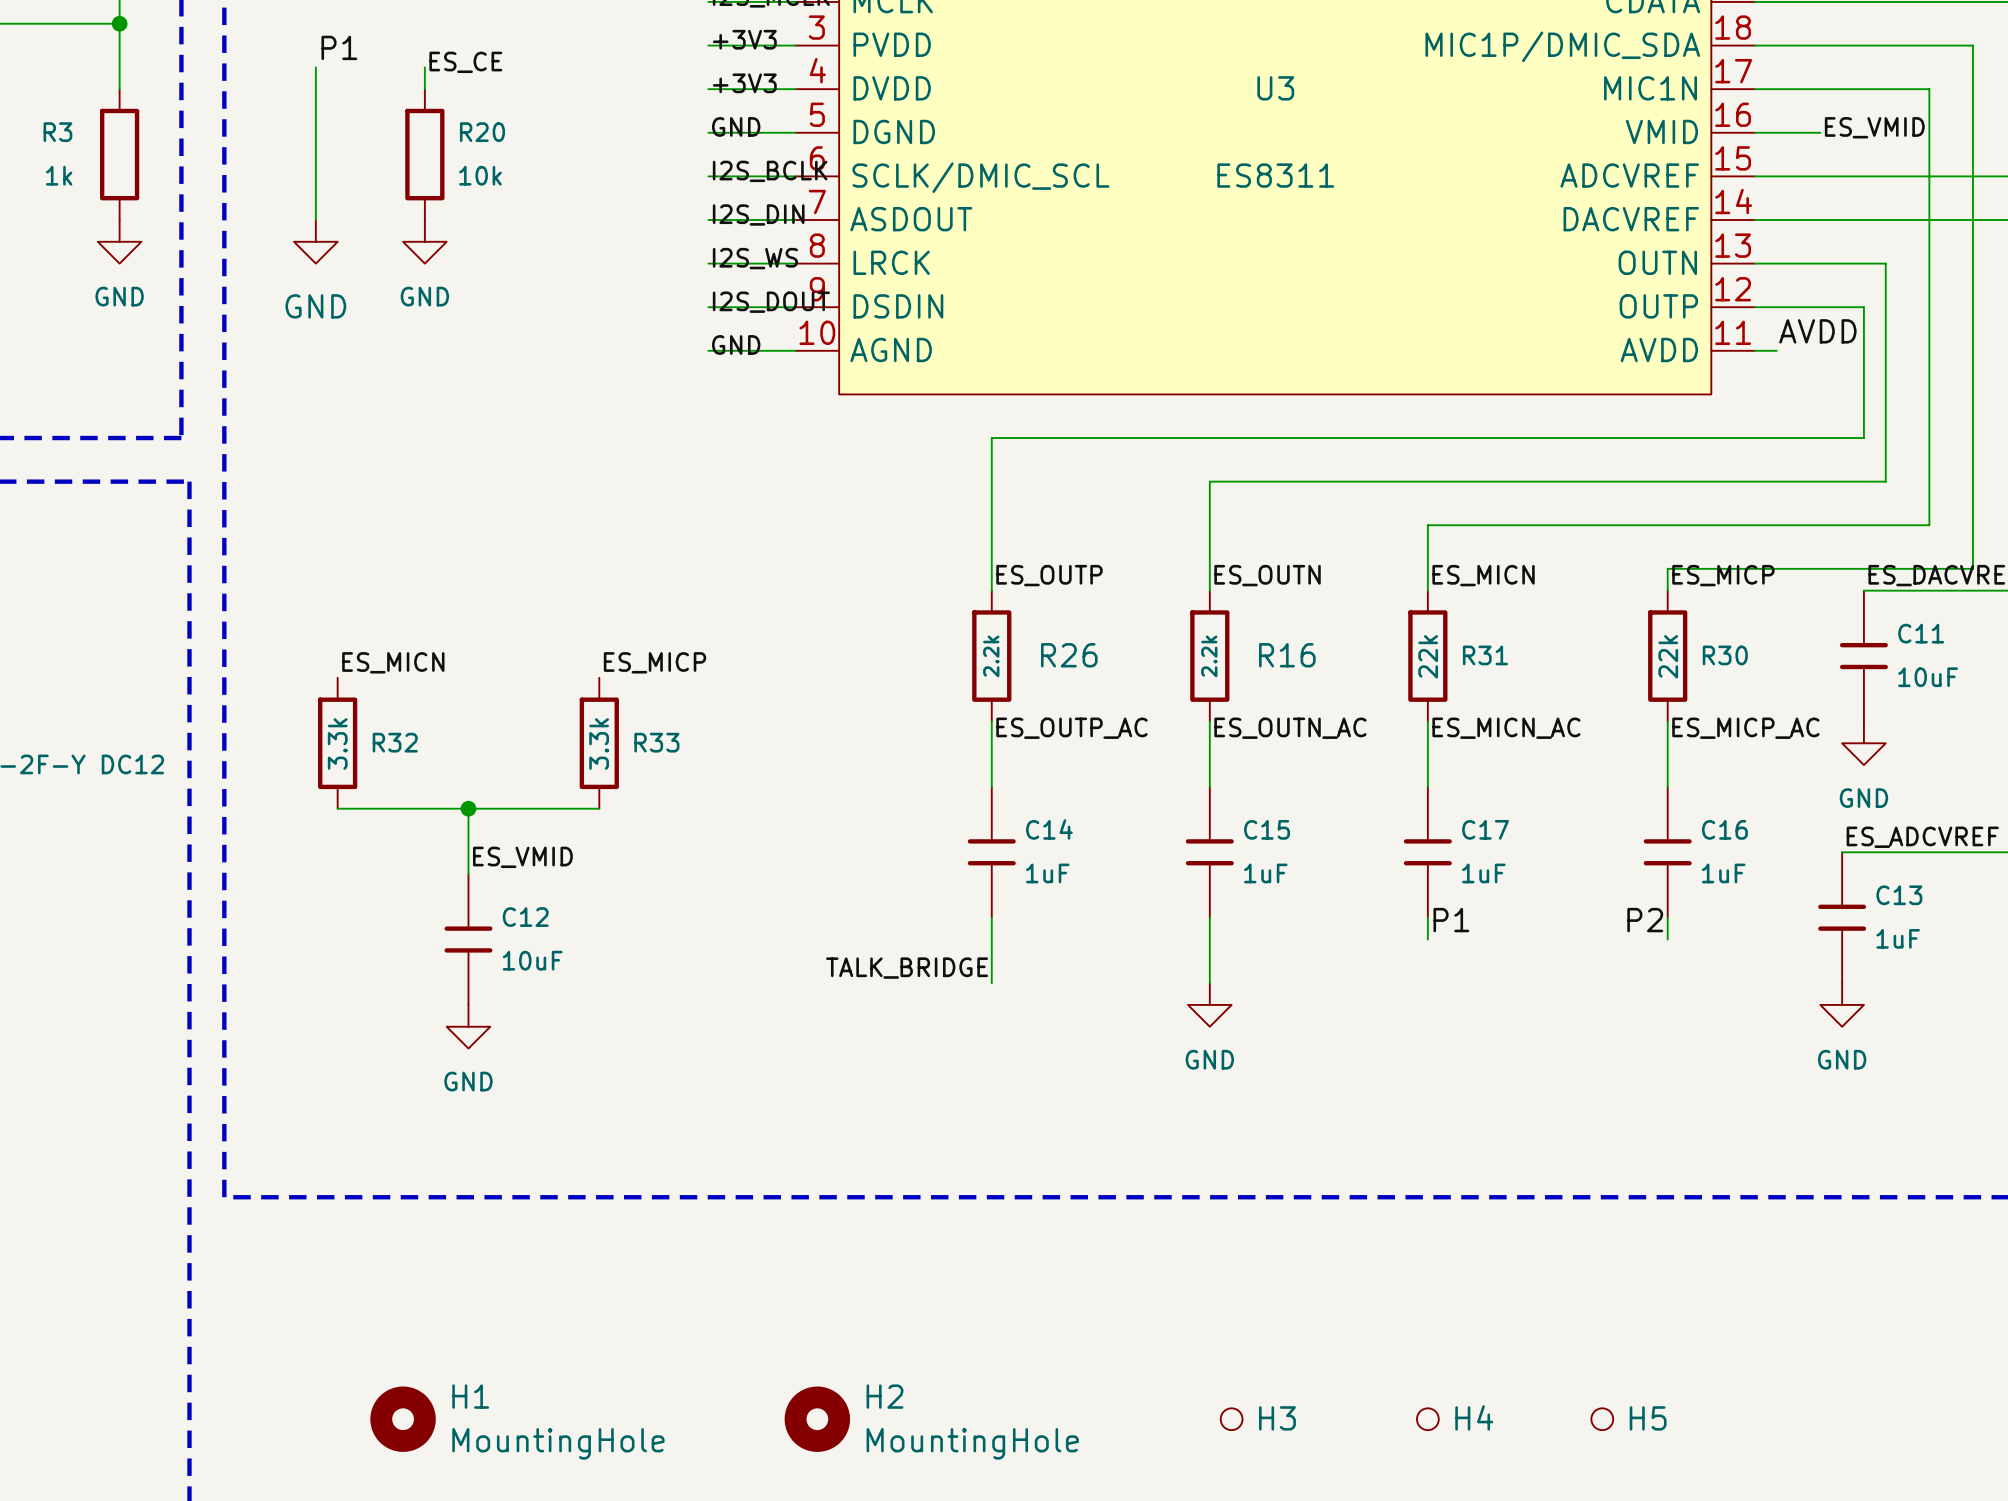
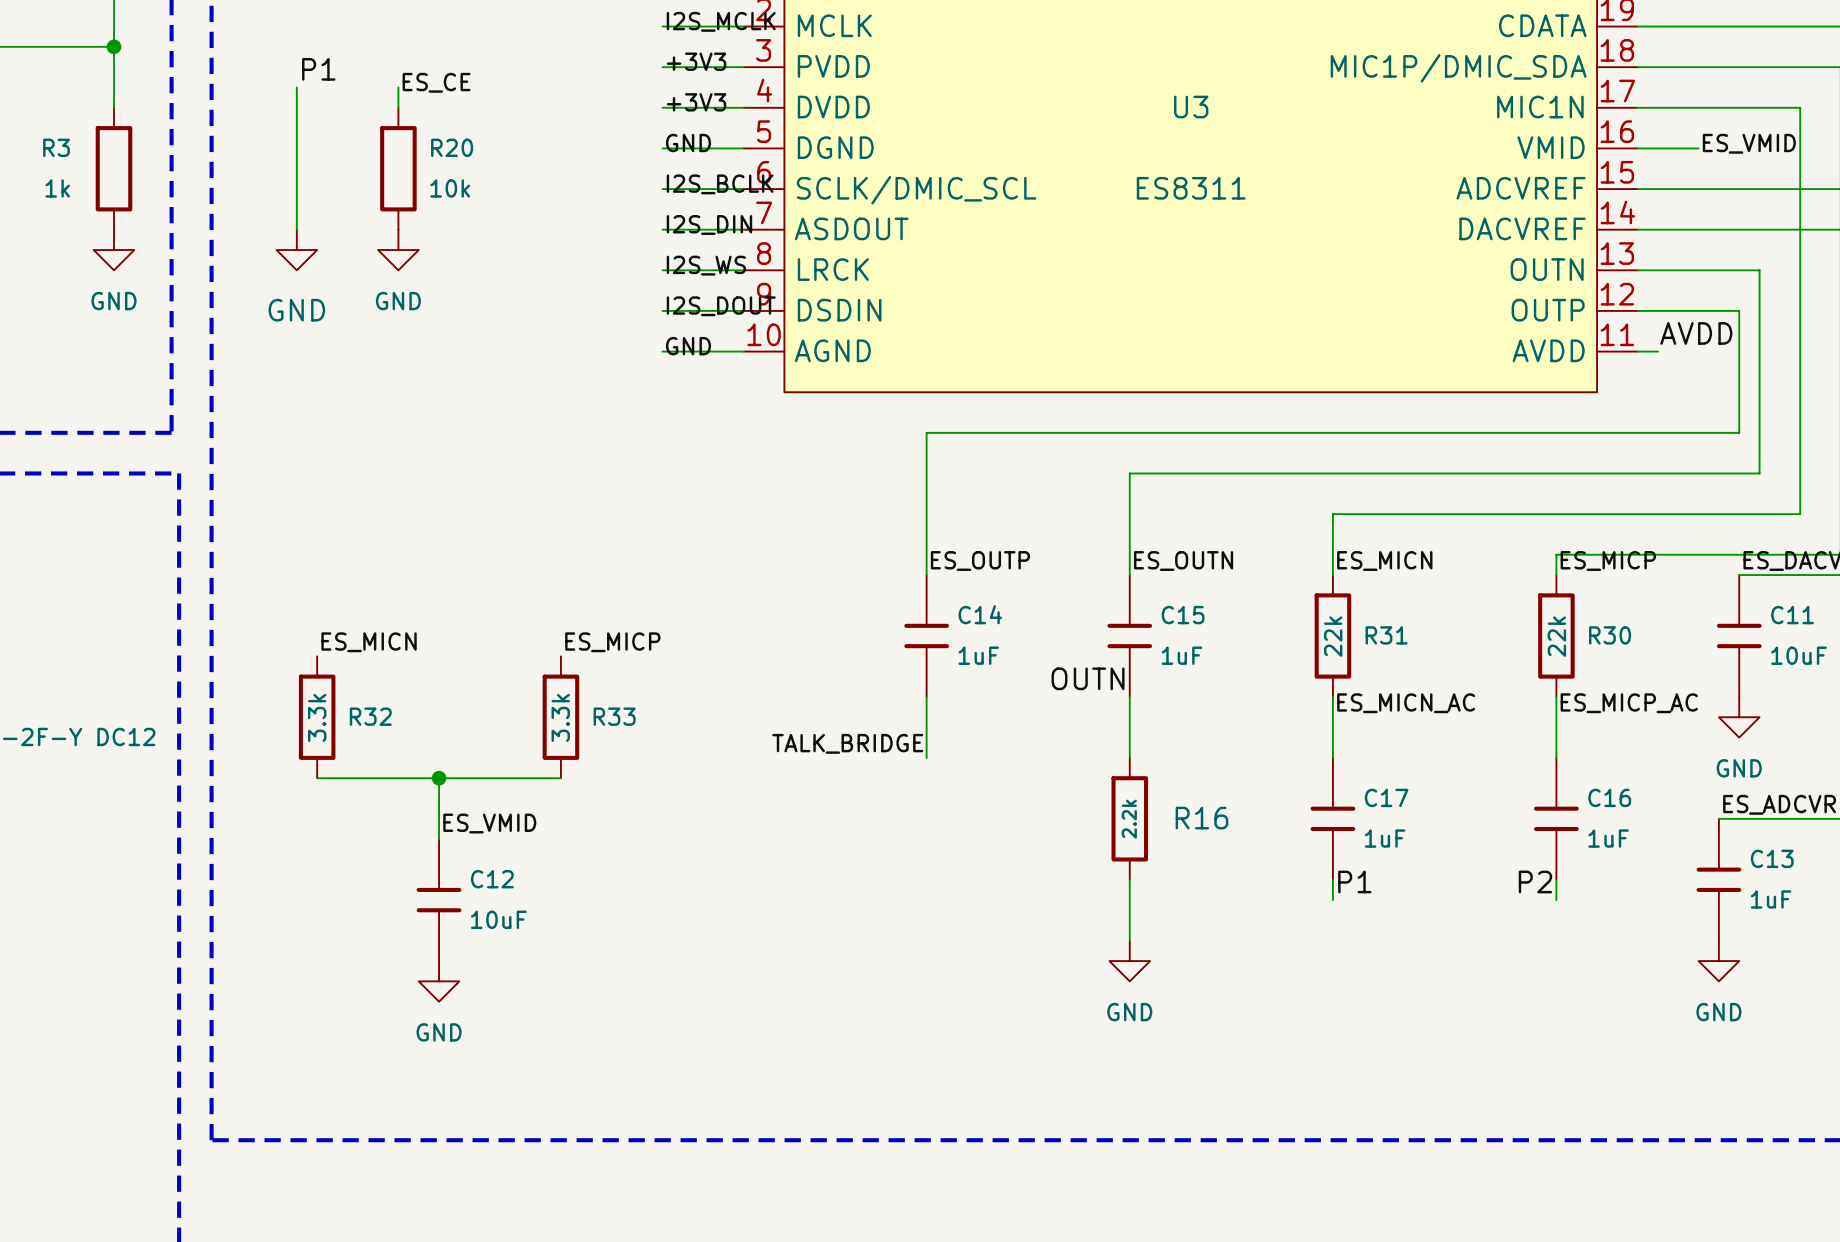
R26: 2.2k (991, 656) -> none
R16 position: (1209, 656) -> (1129, 818)
label: none -> OUTN (1088, 678)
label: ES_OUTP_AC (1071, 728) -> none
label: ES_OUTN_AC (1290, 728) -> none
C14 position: (991, 852) -> (926, 636)
C15 position: (1209, 852) -> (1129, 636)
wire: (991, 917) (991, 983) -> none
label position: TALK_BRIDGE (907, 968) -> TALK_BRIDGE (847, 743)

